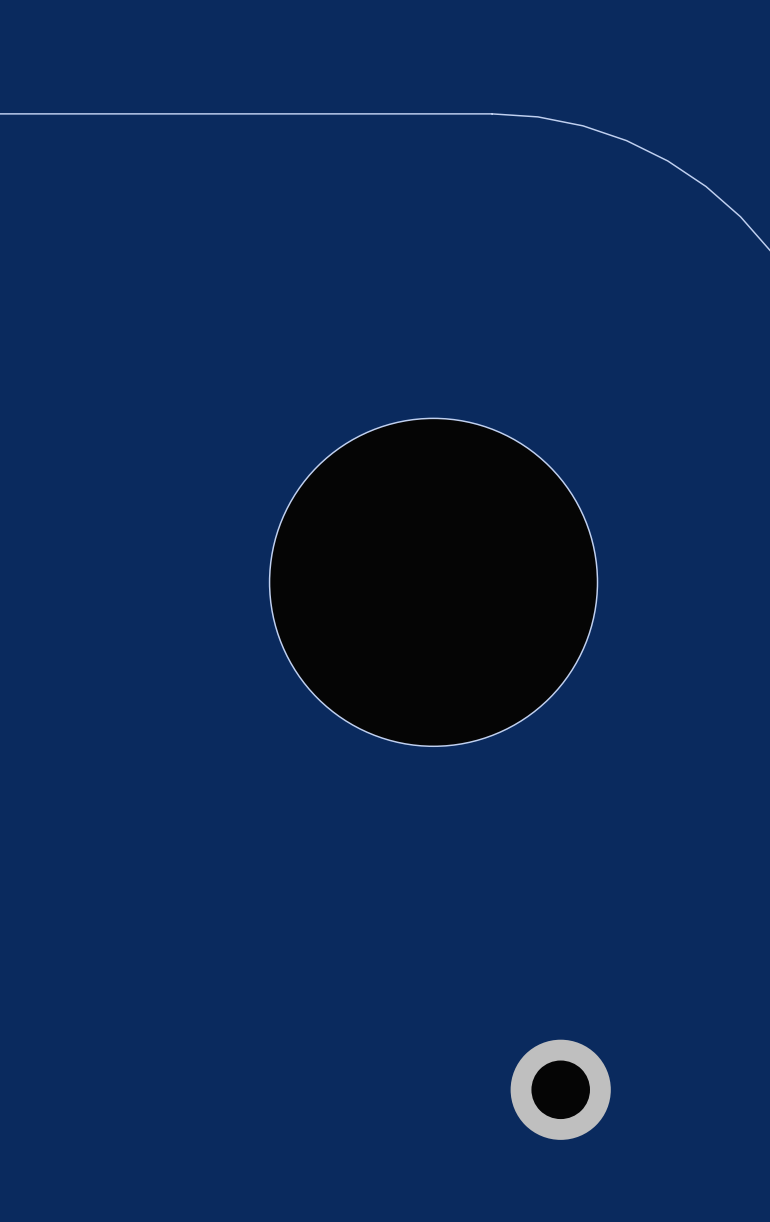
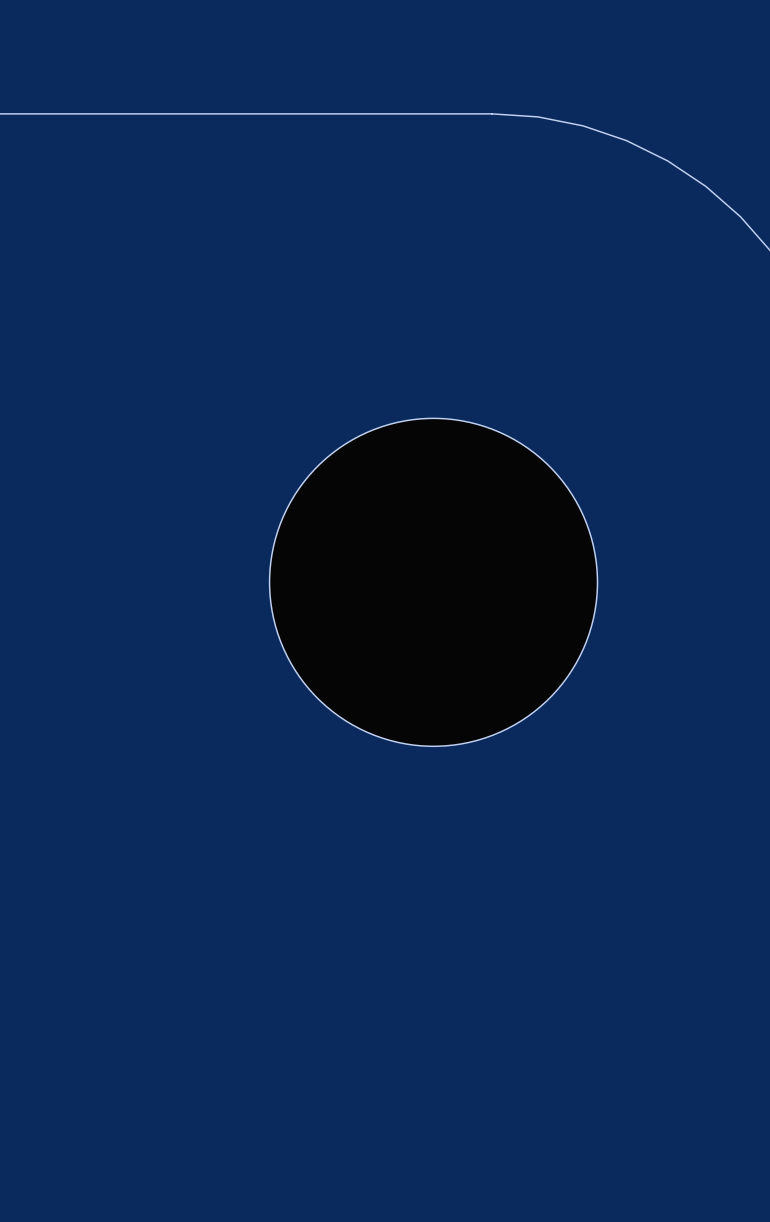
via: (560, 1089) -> none

